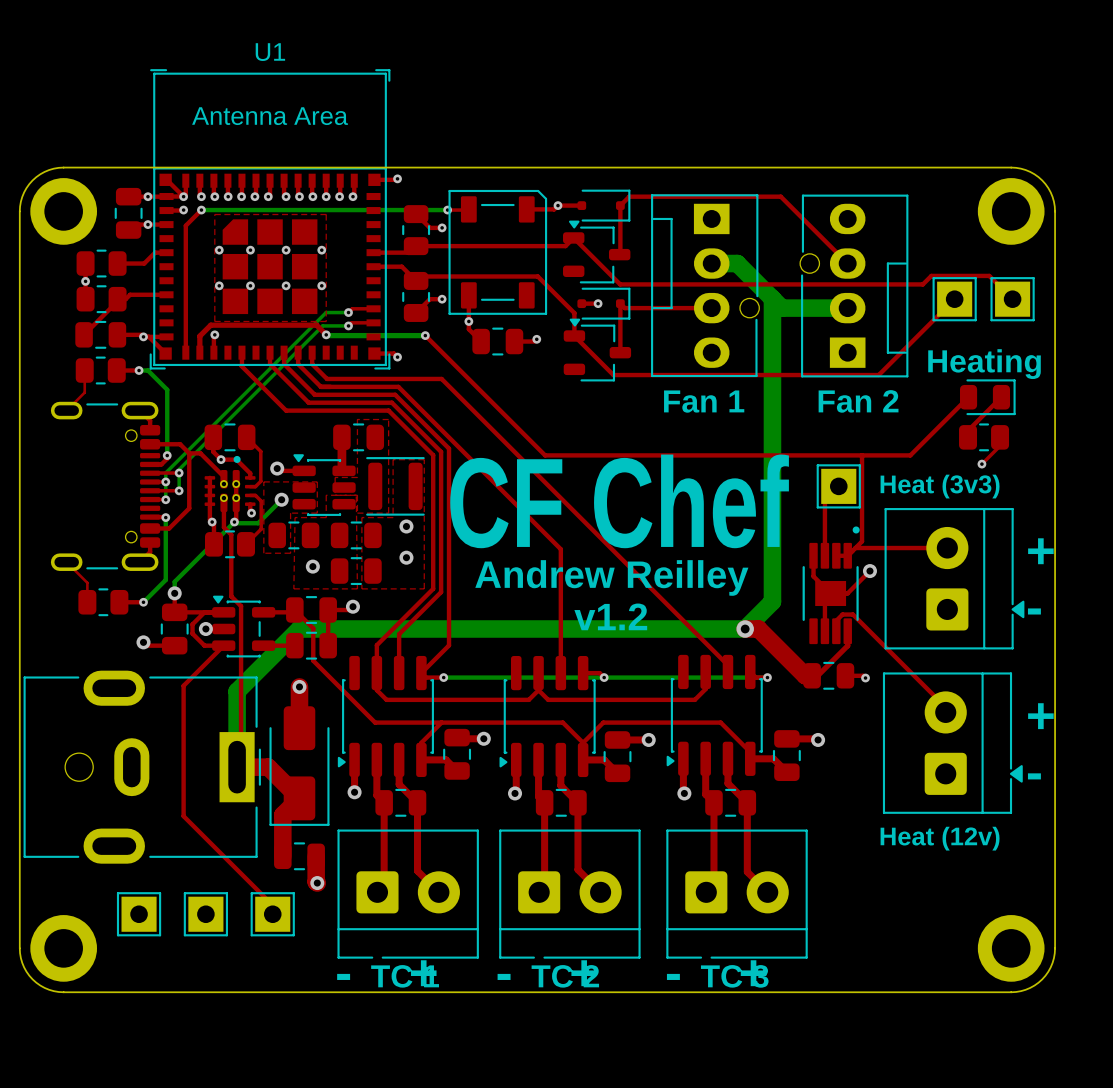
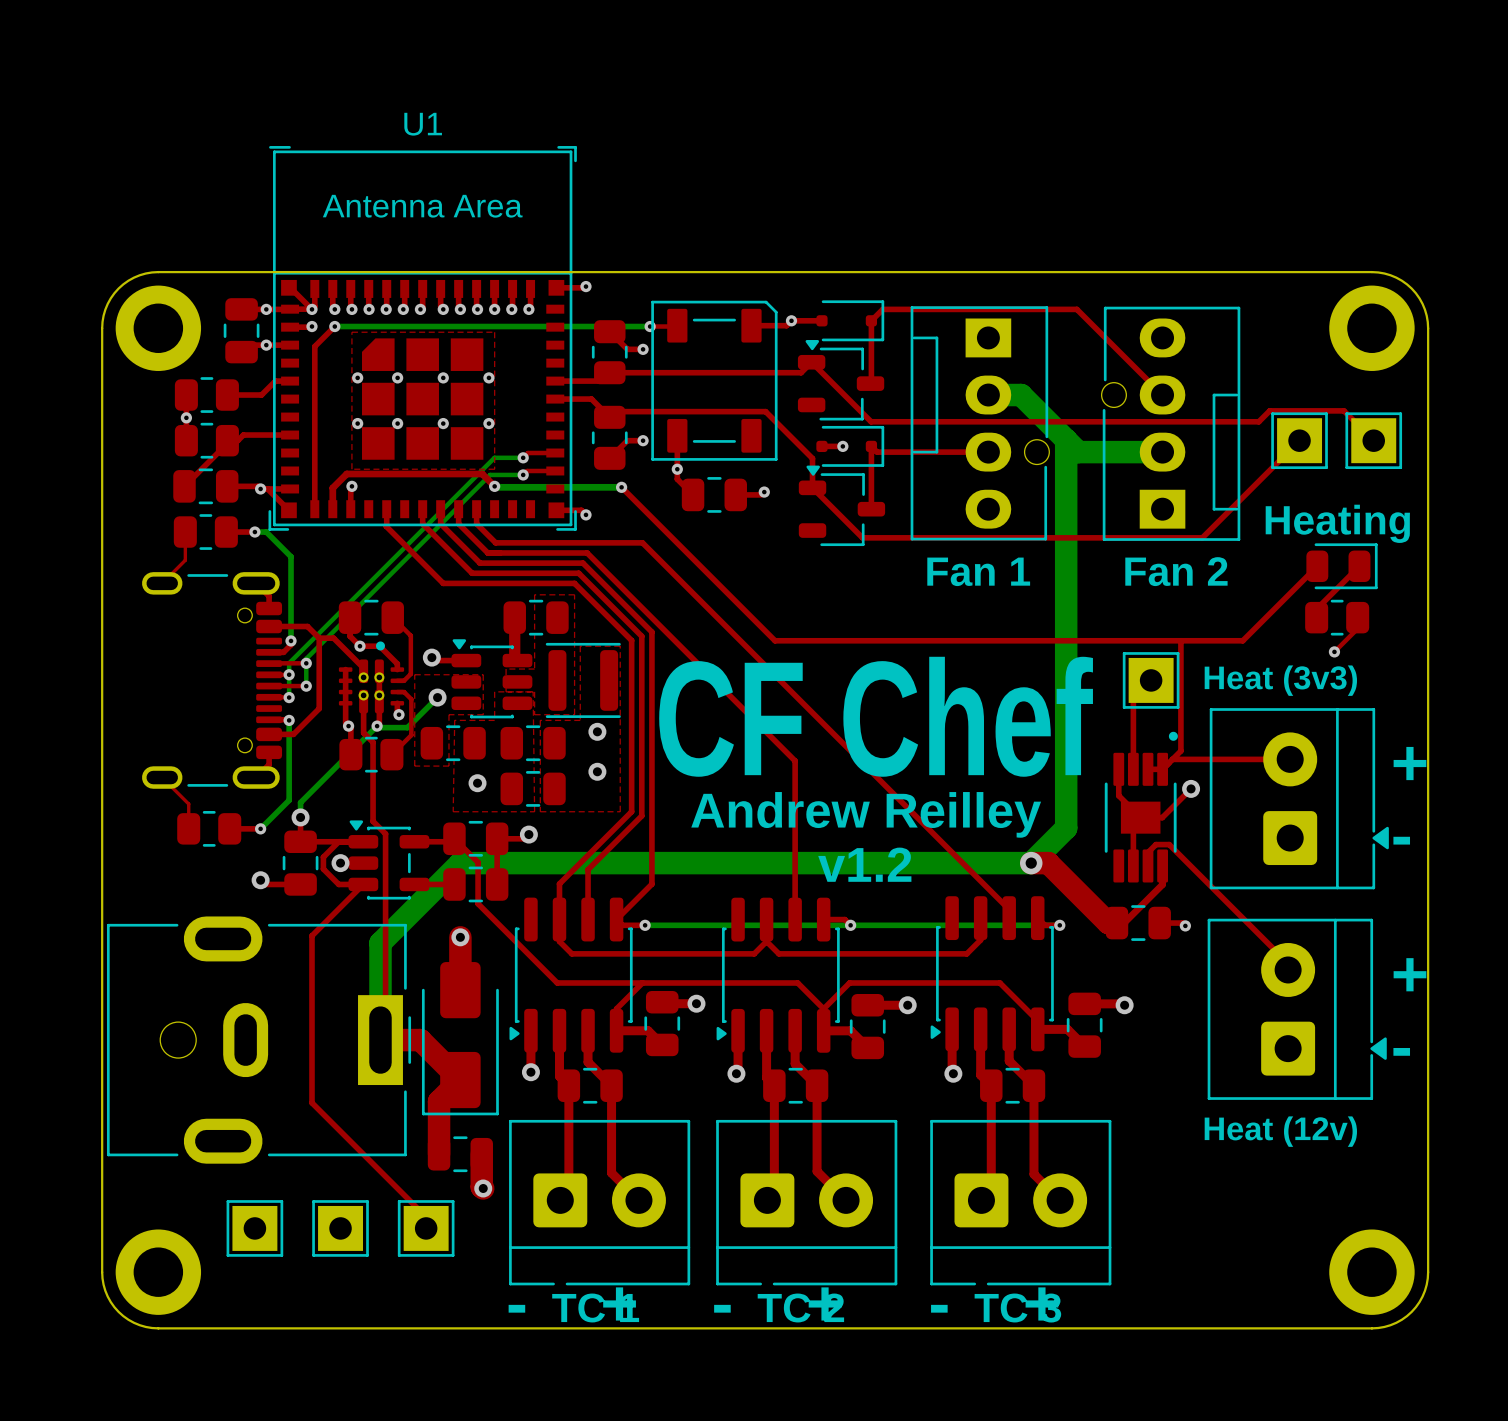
text position: CF Chef (619, 501) -> CF Chef (876, 716)
text position: Andrew Reilley (611, 577) -> Andrew Reilley (866, 814)
text position: v1.2 (610, 616) -> v1.2 (864, 864)

